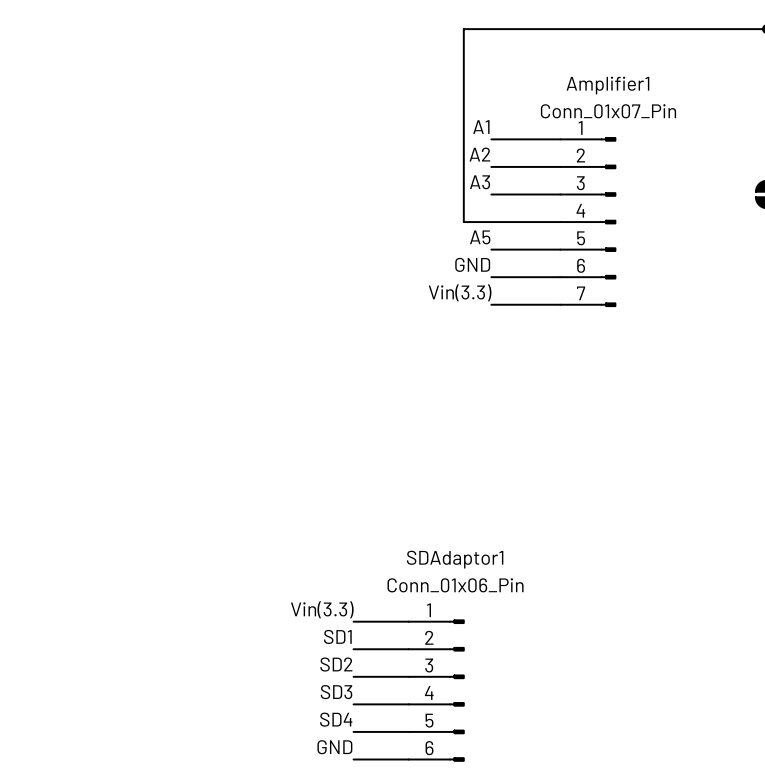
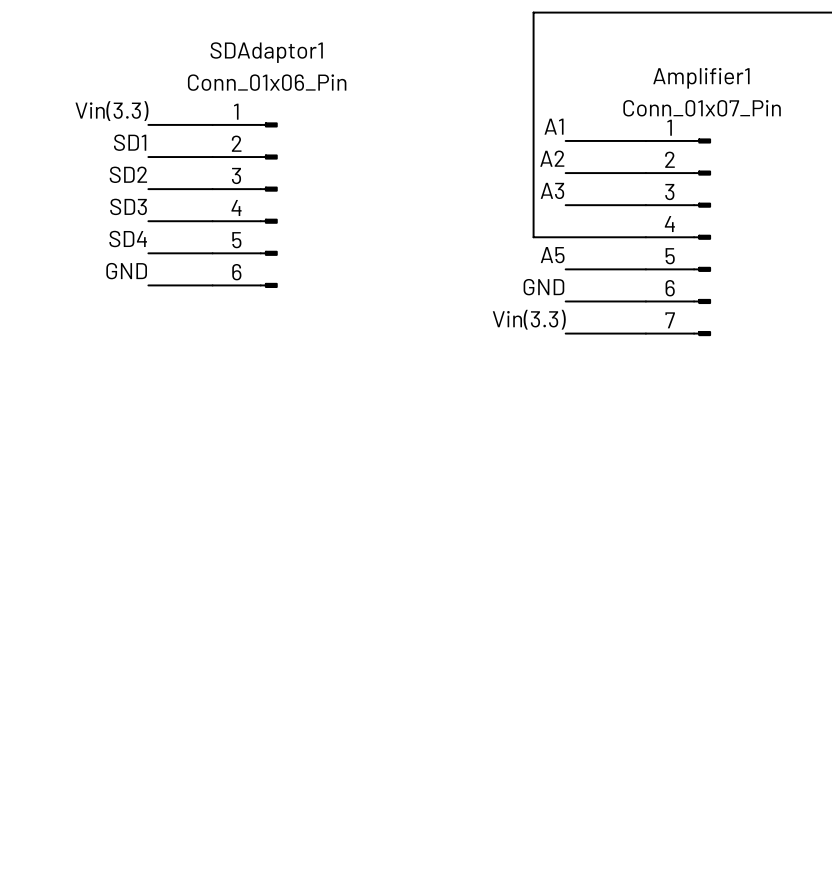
label: none -> Vin(3.3) (112, 111)
wire: none -> (148, 124) (212, 124)
label: none -> SD1 (130, 142)
wire: none -> (148, 157) (212, 157)
label: none -> SD2 (128, 174)
wire: none -> (148, 189) (212, 189)
label: none -> SD3 (128, 206)
wire: none -> (148, 221) (212, 221)
label: none -> SD4 (128, 239)
wire: none -> (148, 253) (212, 253)
label: none -> GND (126, 271)
wire: none -> (148, 285) (212, 285)
label: Vin(3.3) (322, 609) -> none
wire: (353, 621) (408, 621) -> none
label: SD1 (337, 636) -> none
wire: (353, 649) (408, 649) -> none
label: SD2 (336, 664) -> none
wire: (353, 676) (408, 676) -> none
SDAdaptor1 position: (436, 690) -> (245, 205)
label: SD3 (336, 692) -> none
wire: (353, 704) (408, 704) -> none
label: SD4 (336, 719) -> none
wire: (353, 731) (408, 731) -> none
label: GND (334, 747) -> none
wire: (353, 759) (408, 759) -> none

